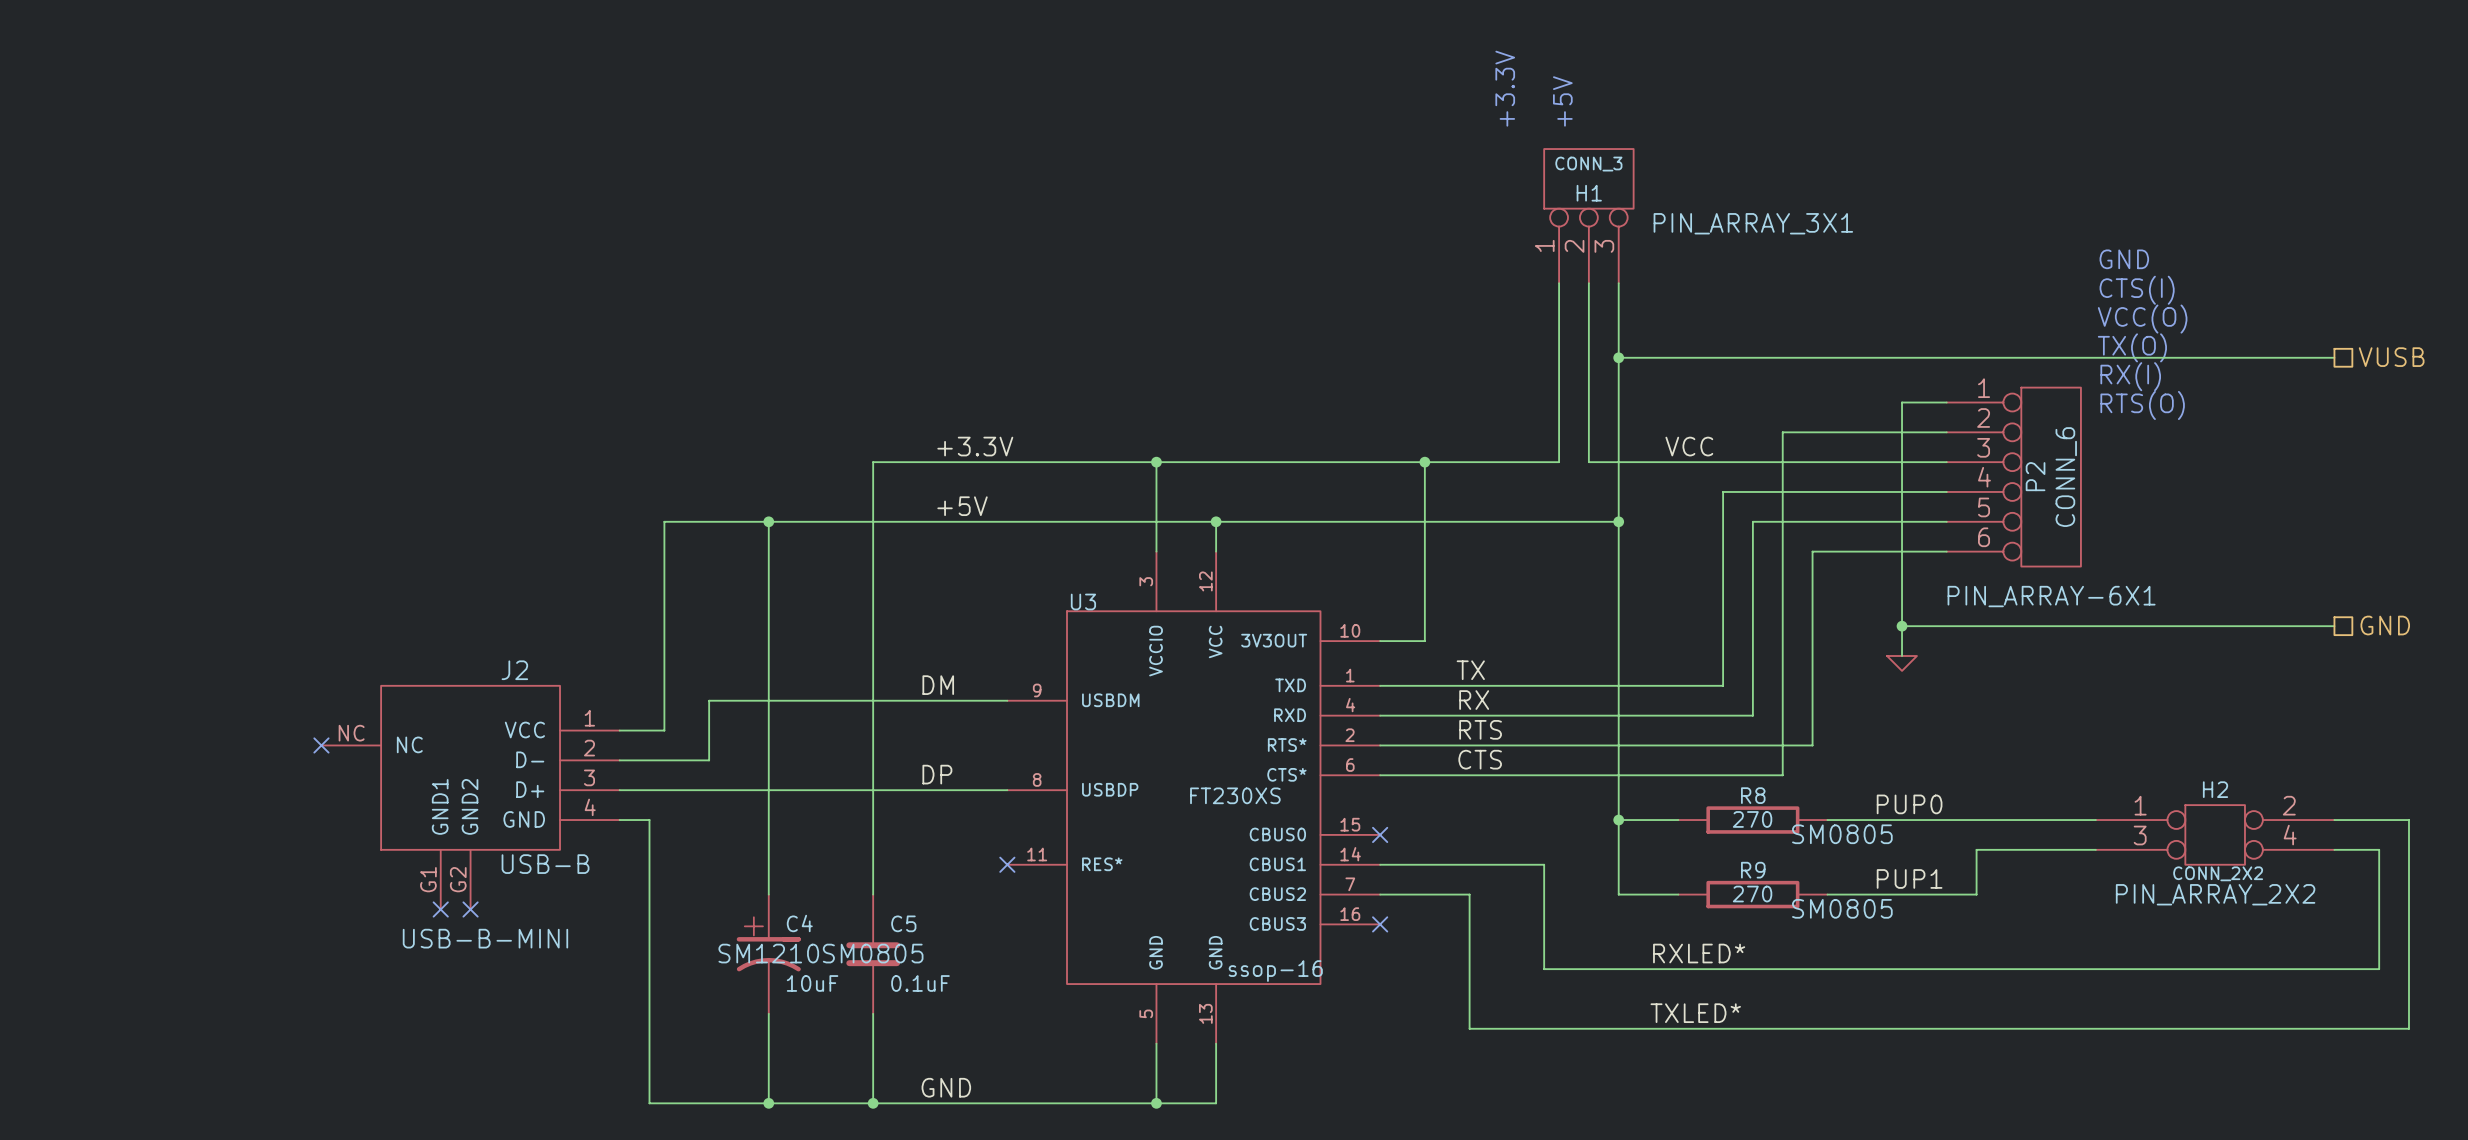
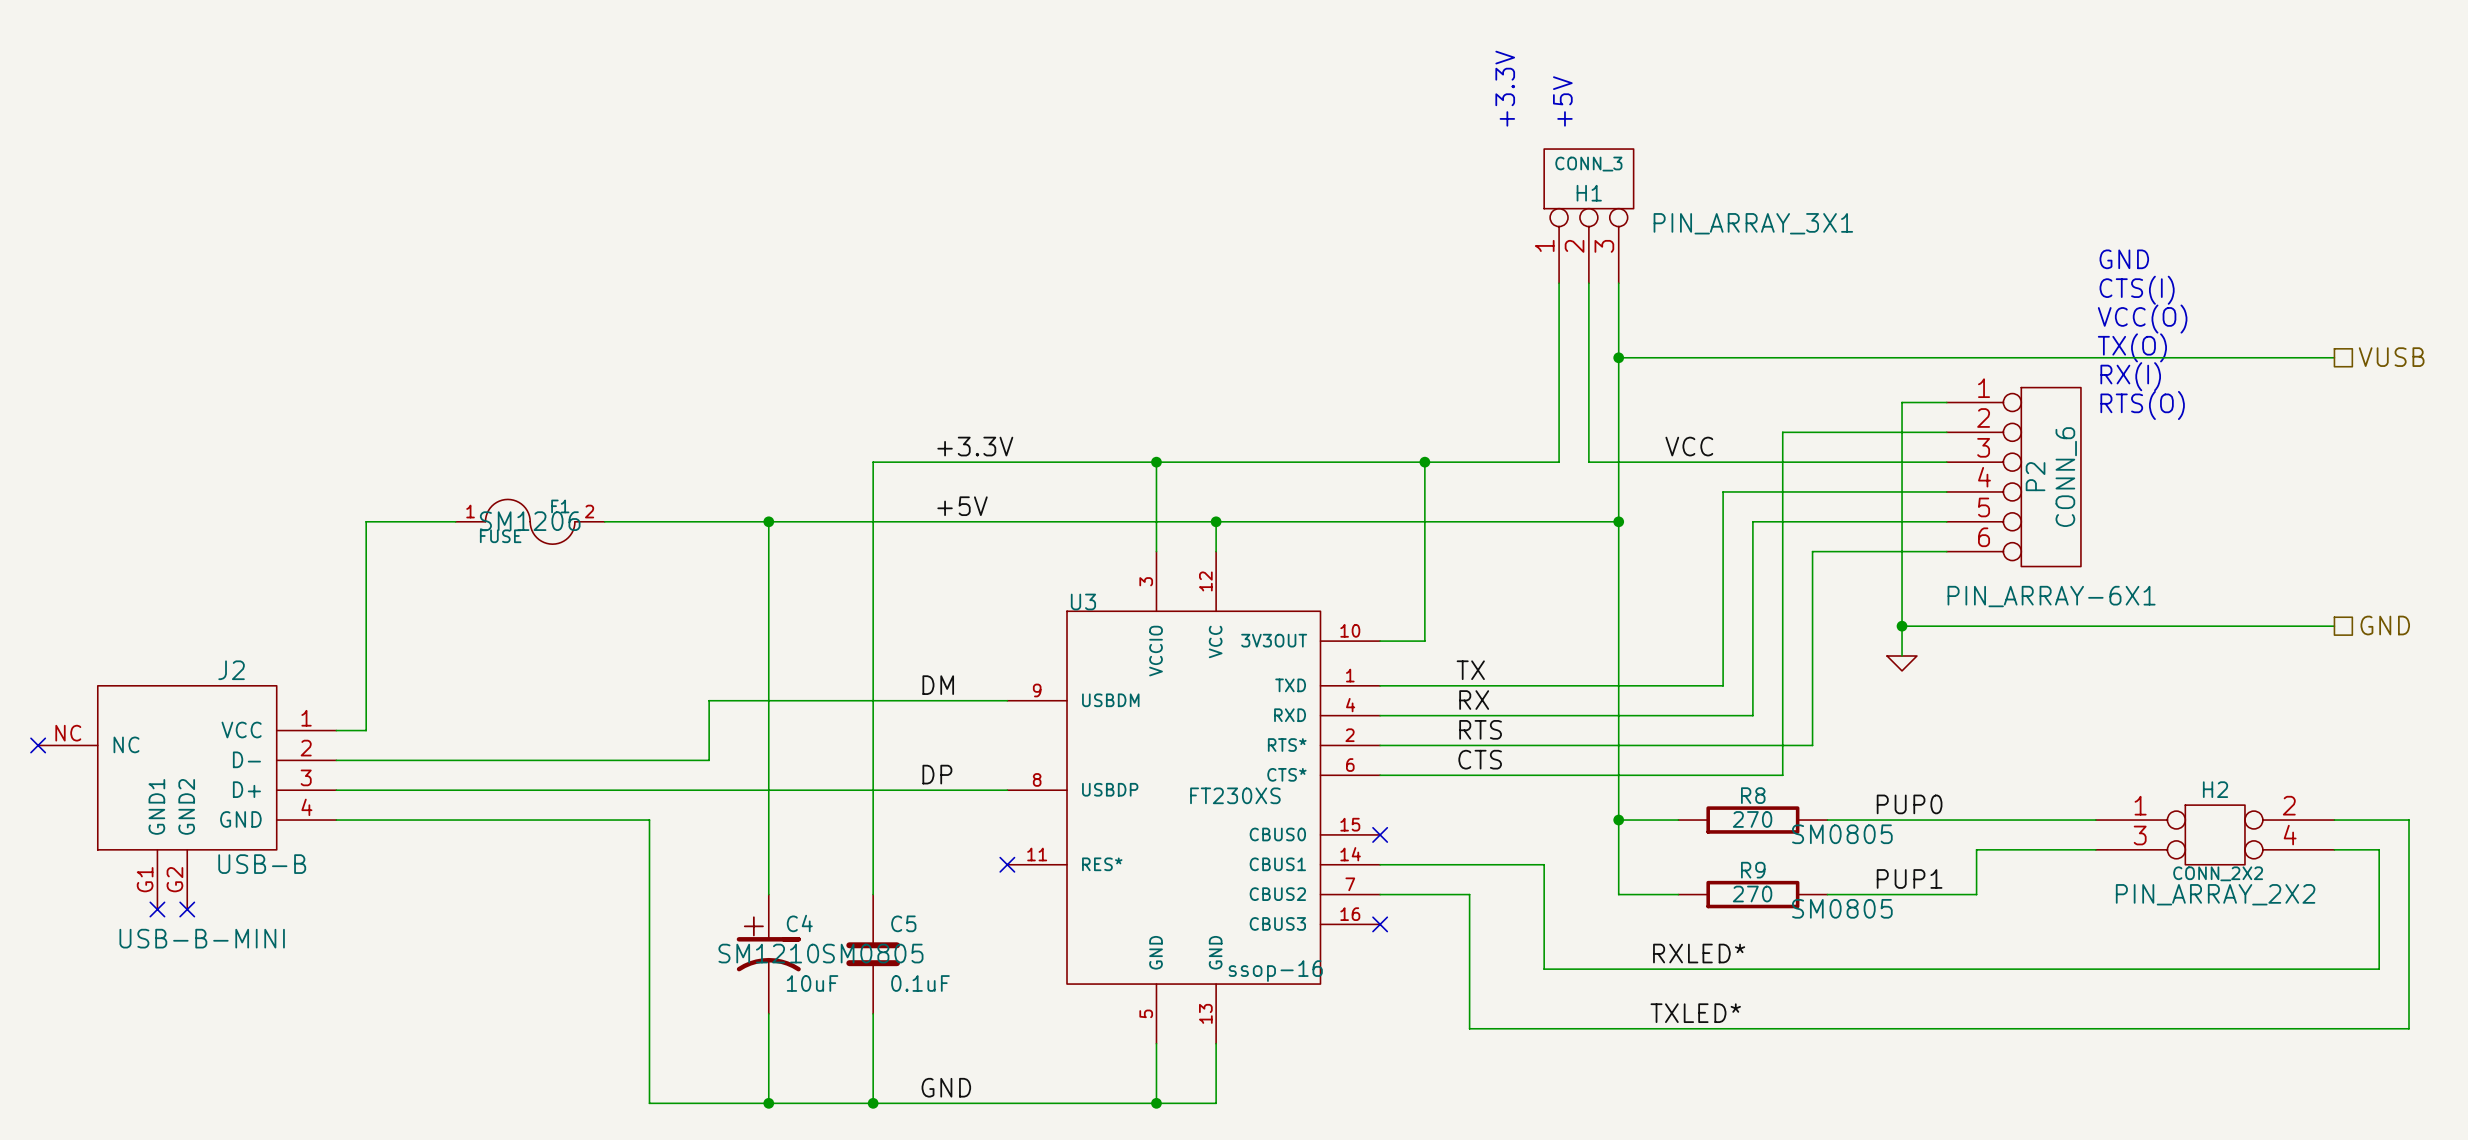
wire: none -> (455, 521) (366, 521) (366, 730) (336, 730)
F1: none -> FUSE (530, 521)
wire: (664, 521) (664, 730) (619, 730) -> (664, 521) (604, 521)
no-connect mark: none -> (38, 745)
no-connect mark: (321, 745) -> none
wire: none -> (336, 760) (619, 760)
wire: none -> (336, 790) (619, 790)
J2 position: (470, 797) -> (187, 797)
wire: none -> (336, 820) (619, 820)
no-connect mark: none -> (157, 909)
no-connect mark: none -> (187, 909)
no-connect mark: (440, 909) -> none
no-connect mark: (470, 909) -> none

